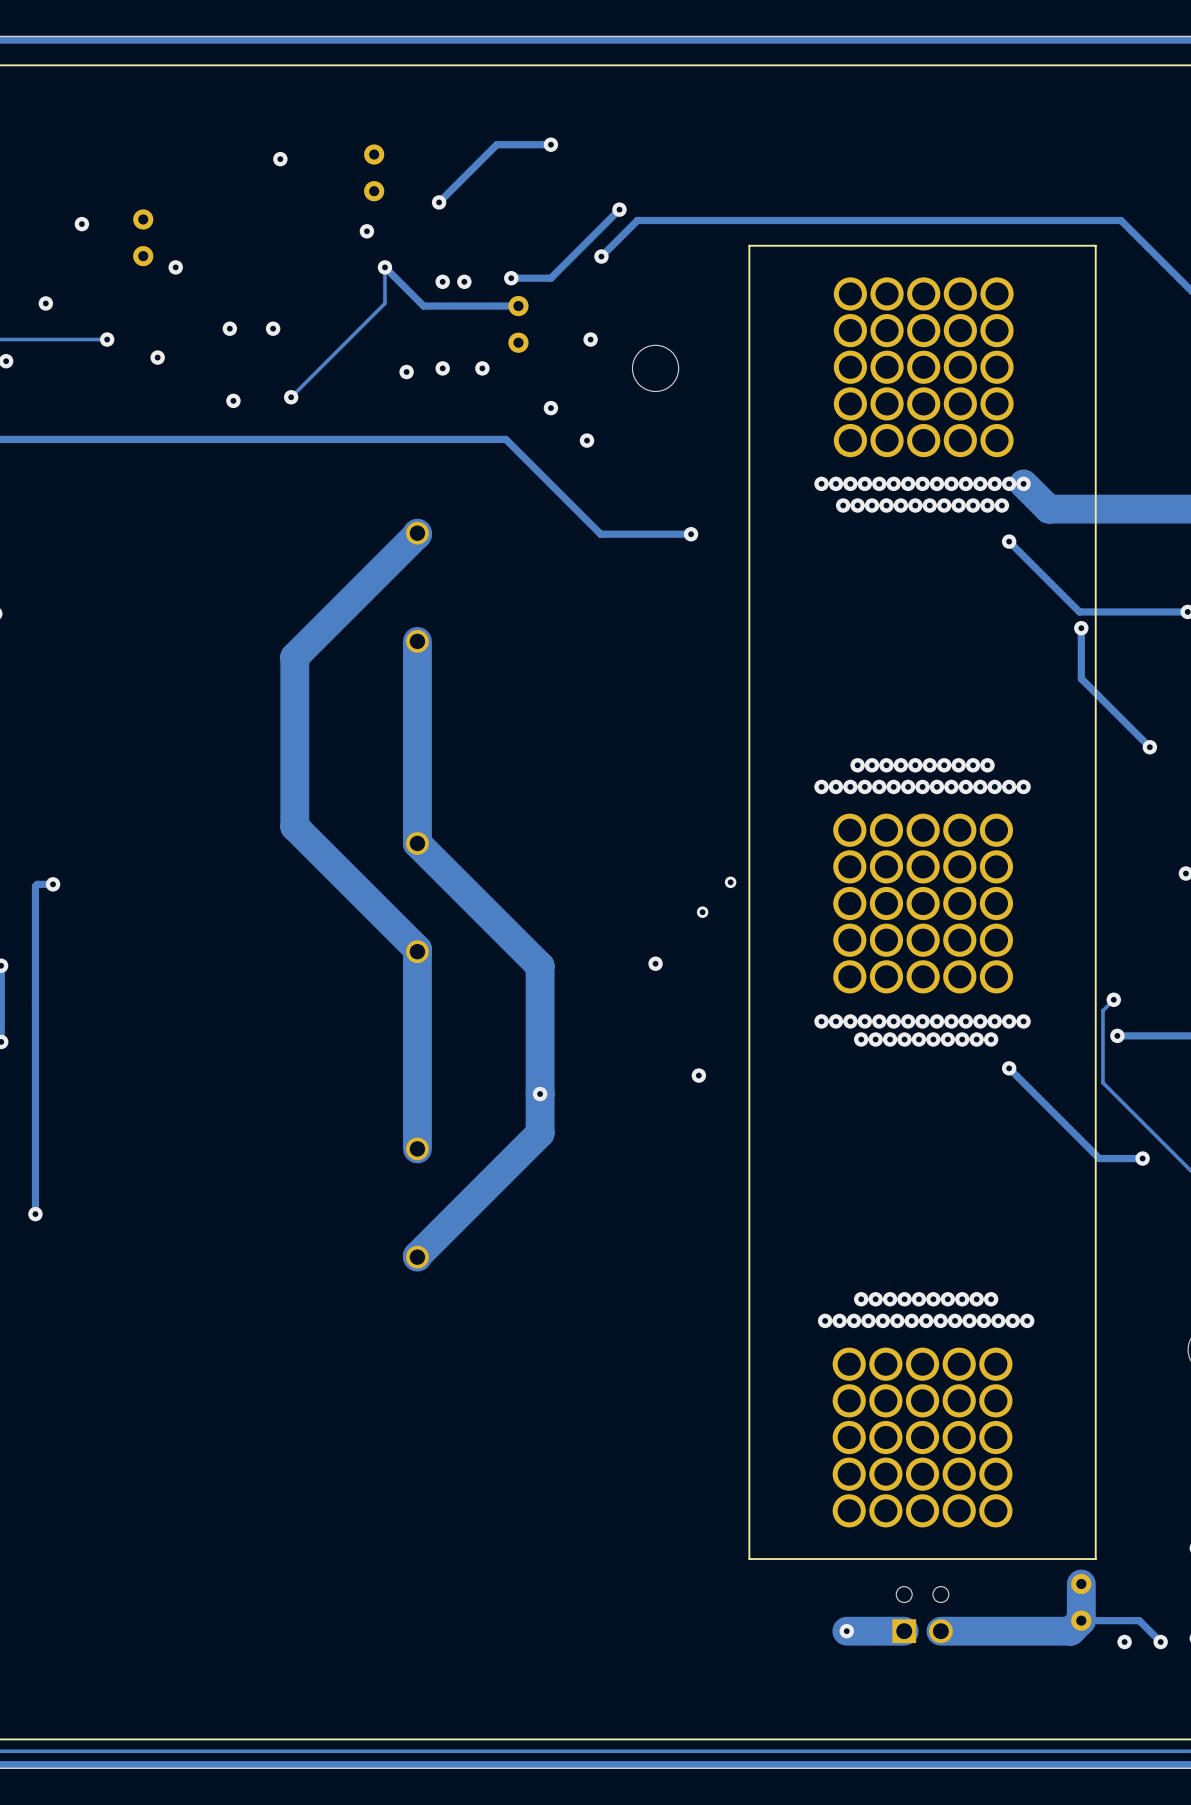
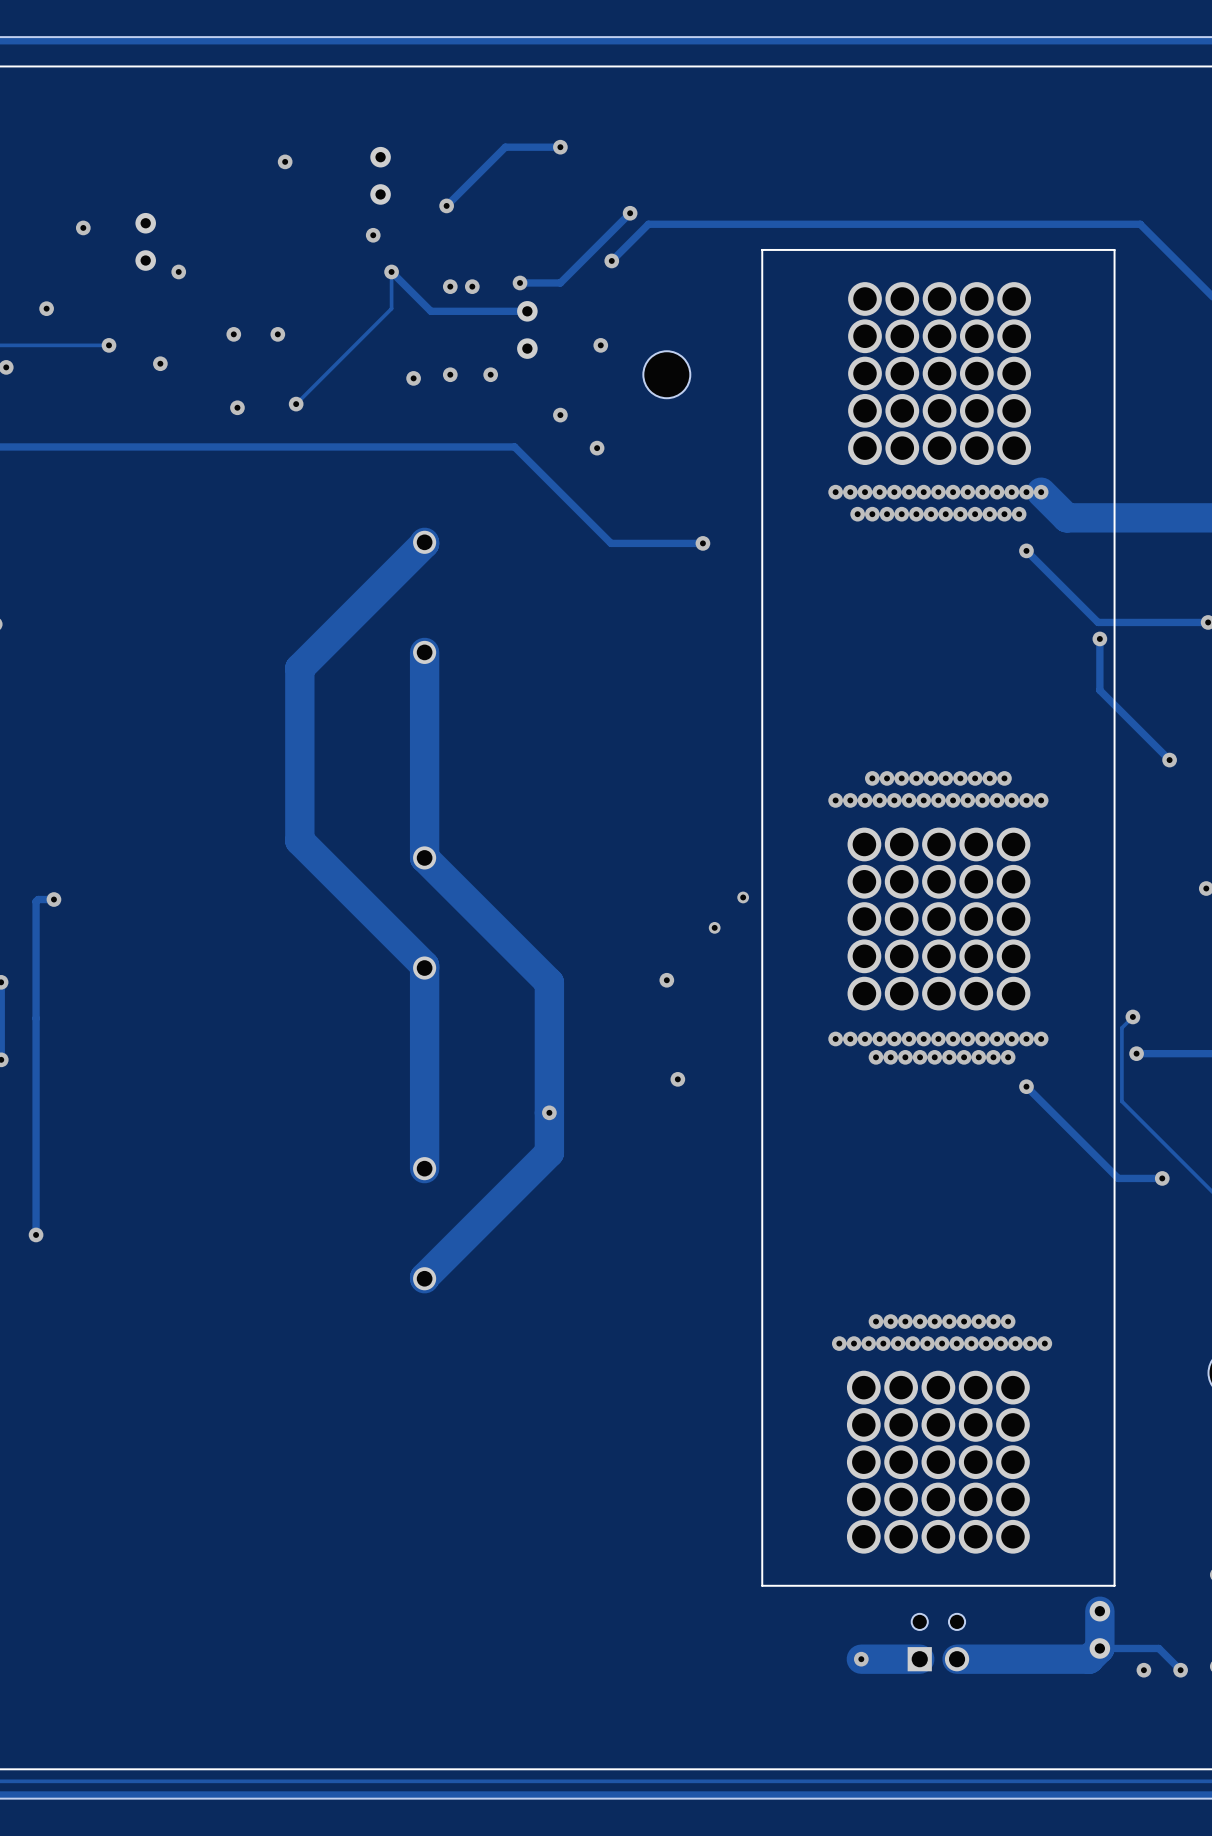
via position: (698, 1075) -> (677, 1079)

